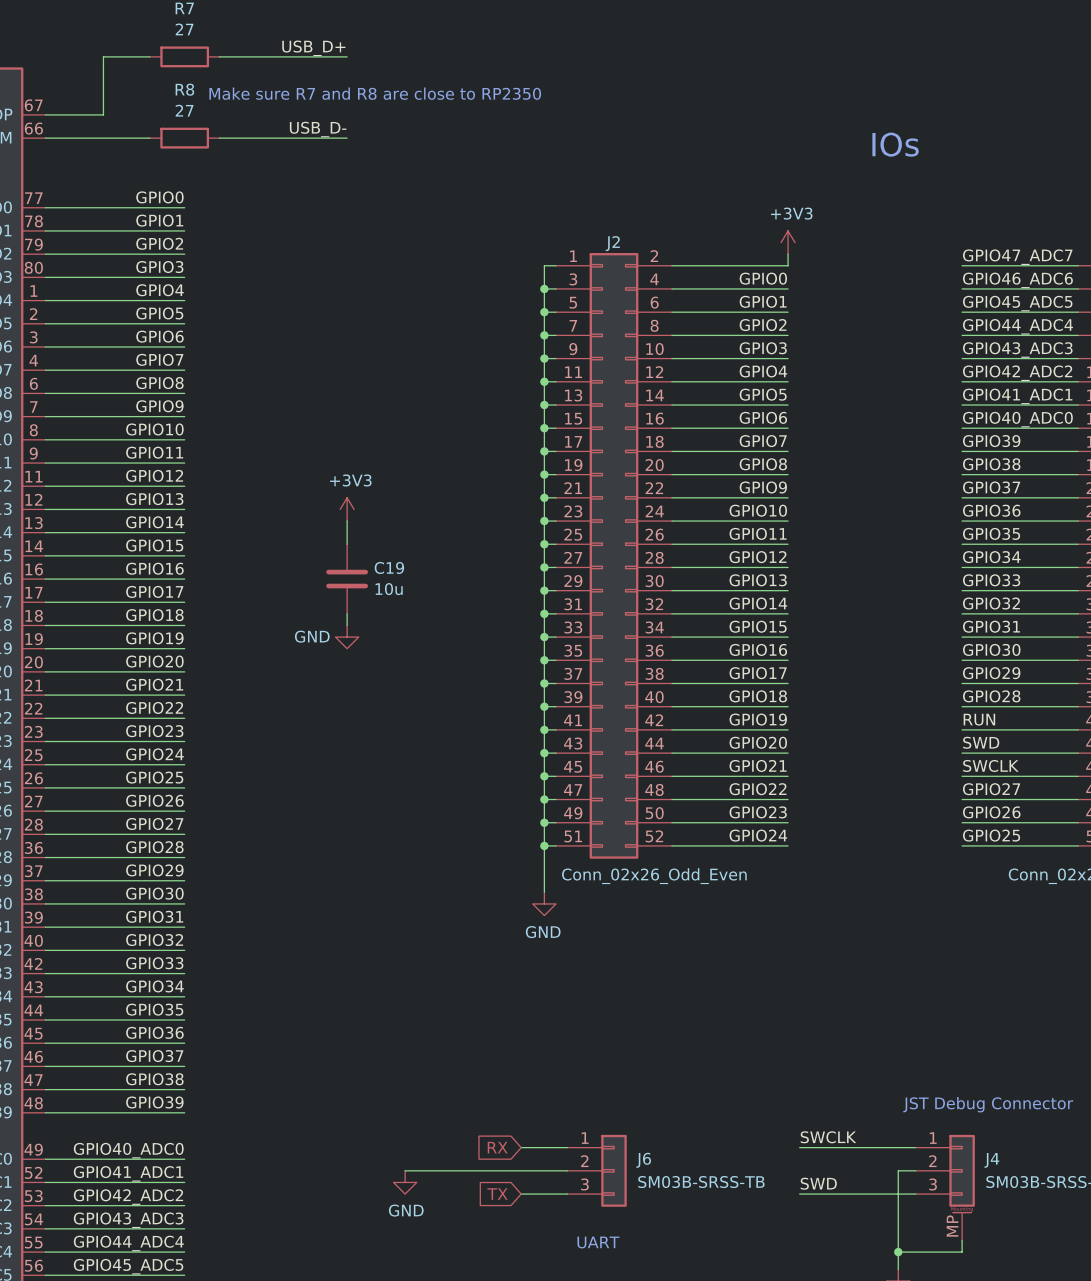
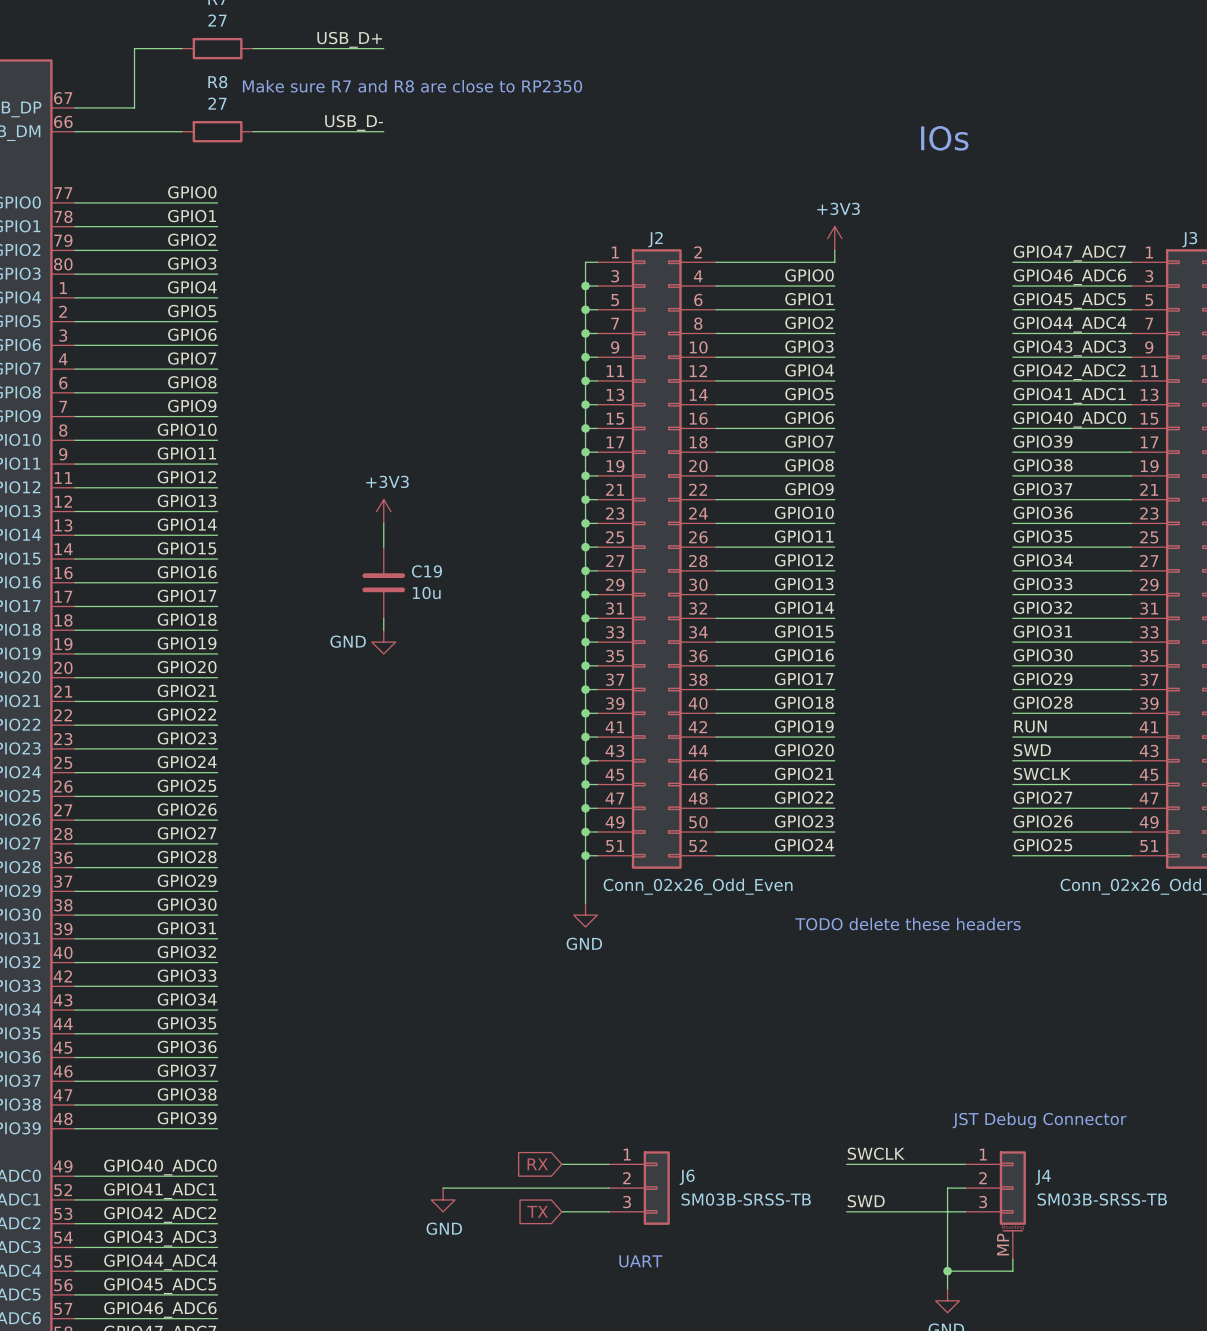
text: none -> TODO delete these headers (907, 924)

